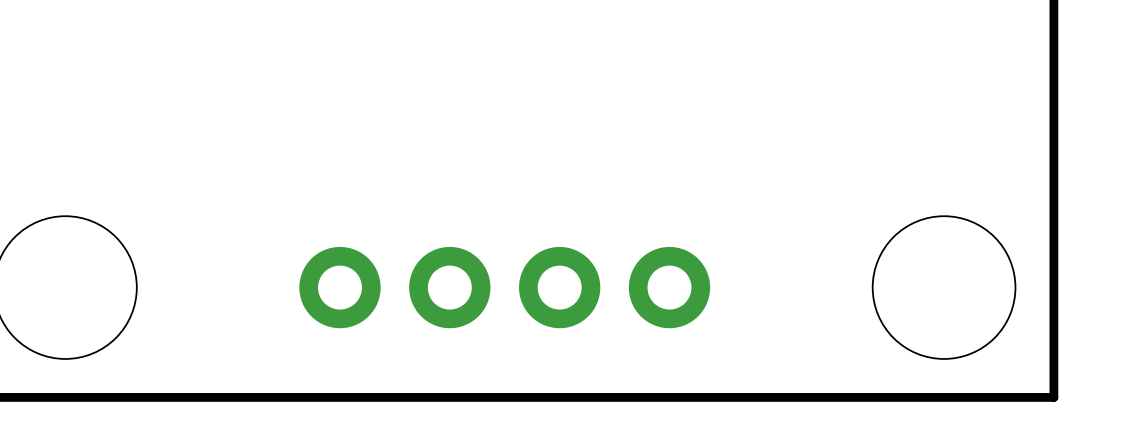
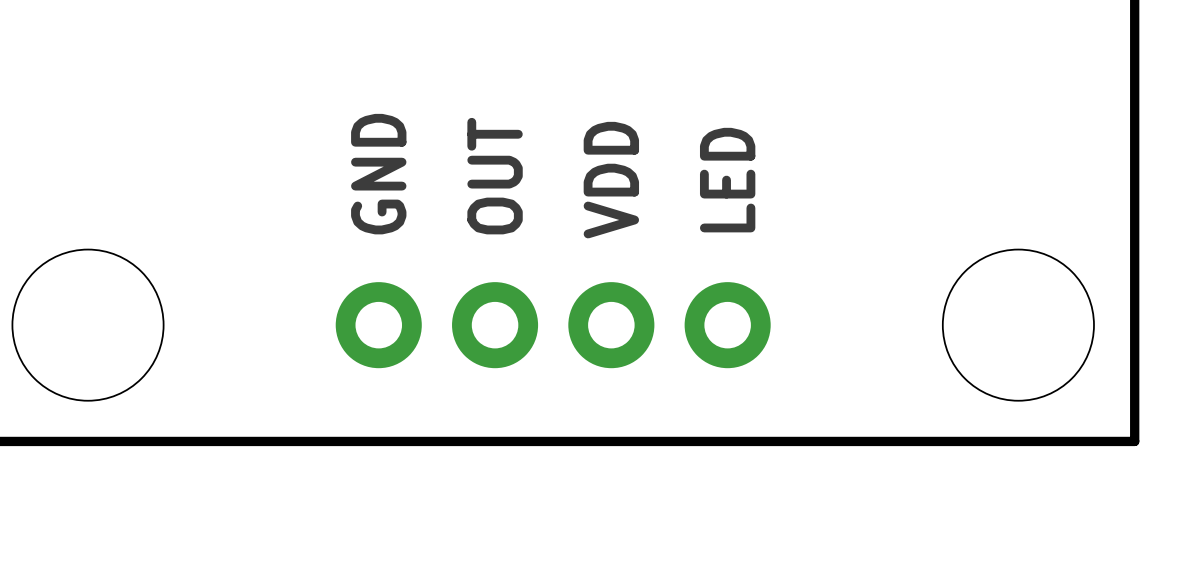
text: none -> GND (378, 174)
text: none -> OUT (495, 176)
text: none -> VDD (611, 180)
text: none -> LED (727, 180)

